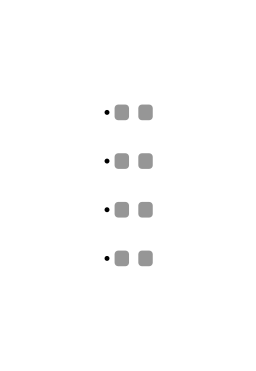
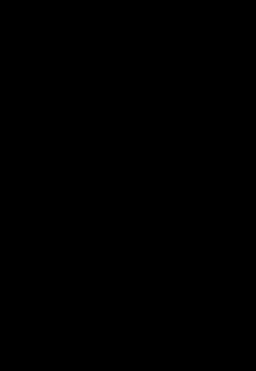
part: (128, 112) -> none
part: (128, 161) -> none
part: (128, 209) -> none
part: (128, 258) -> none

